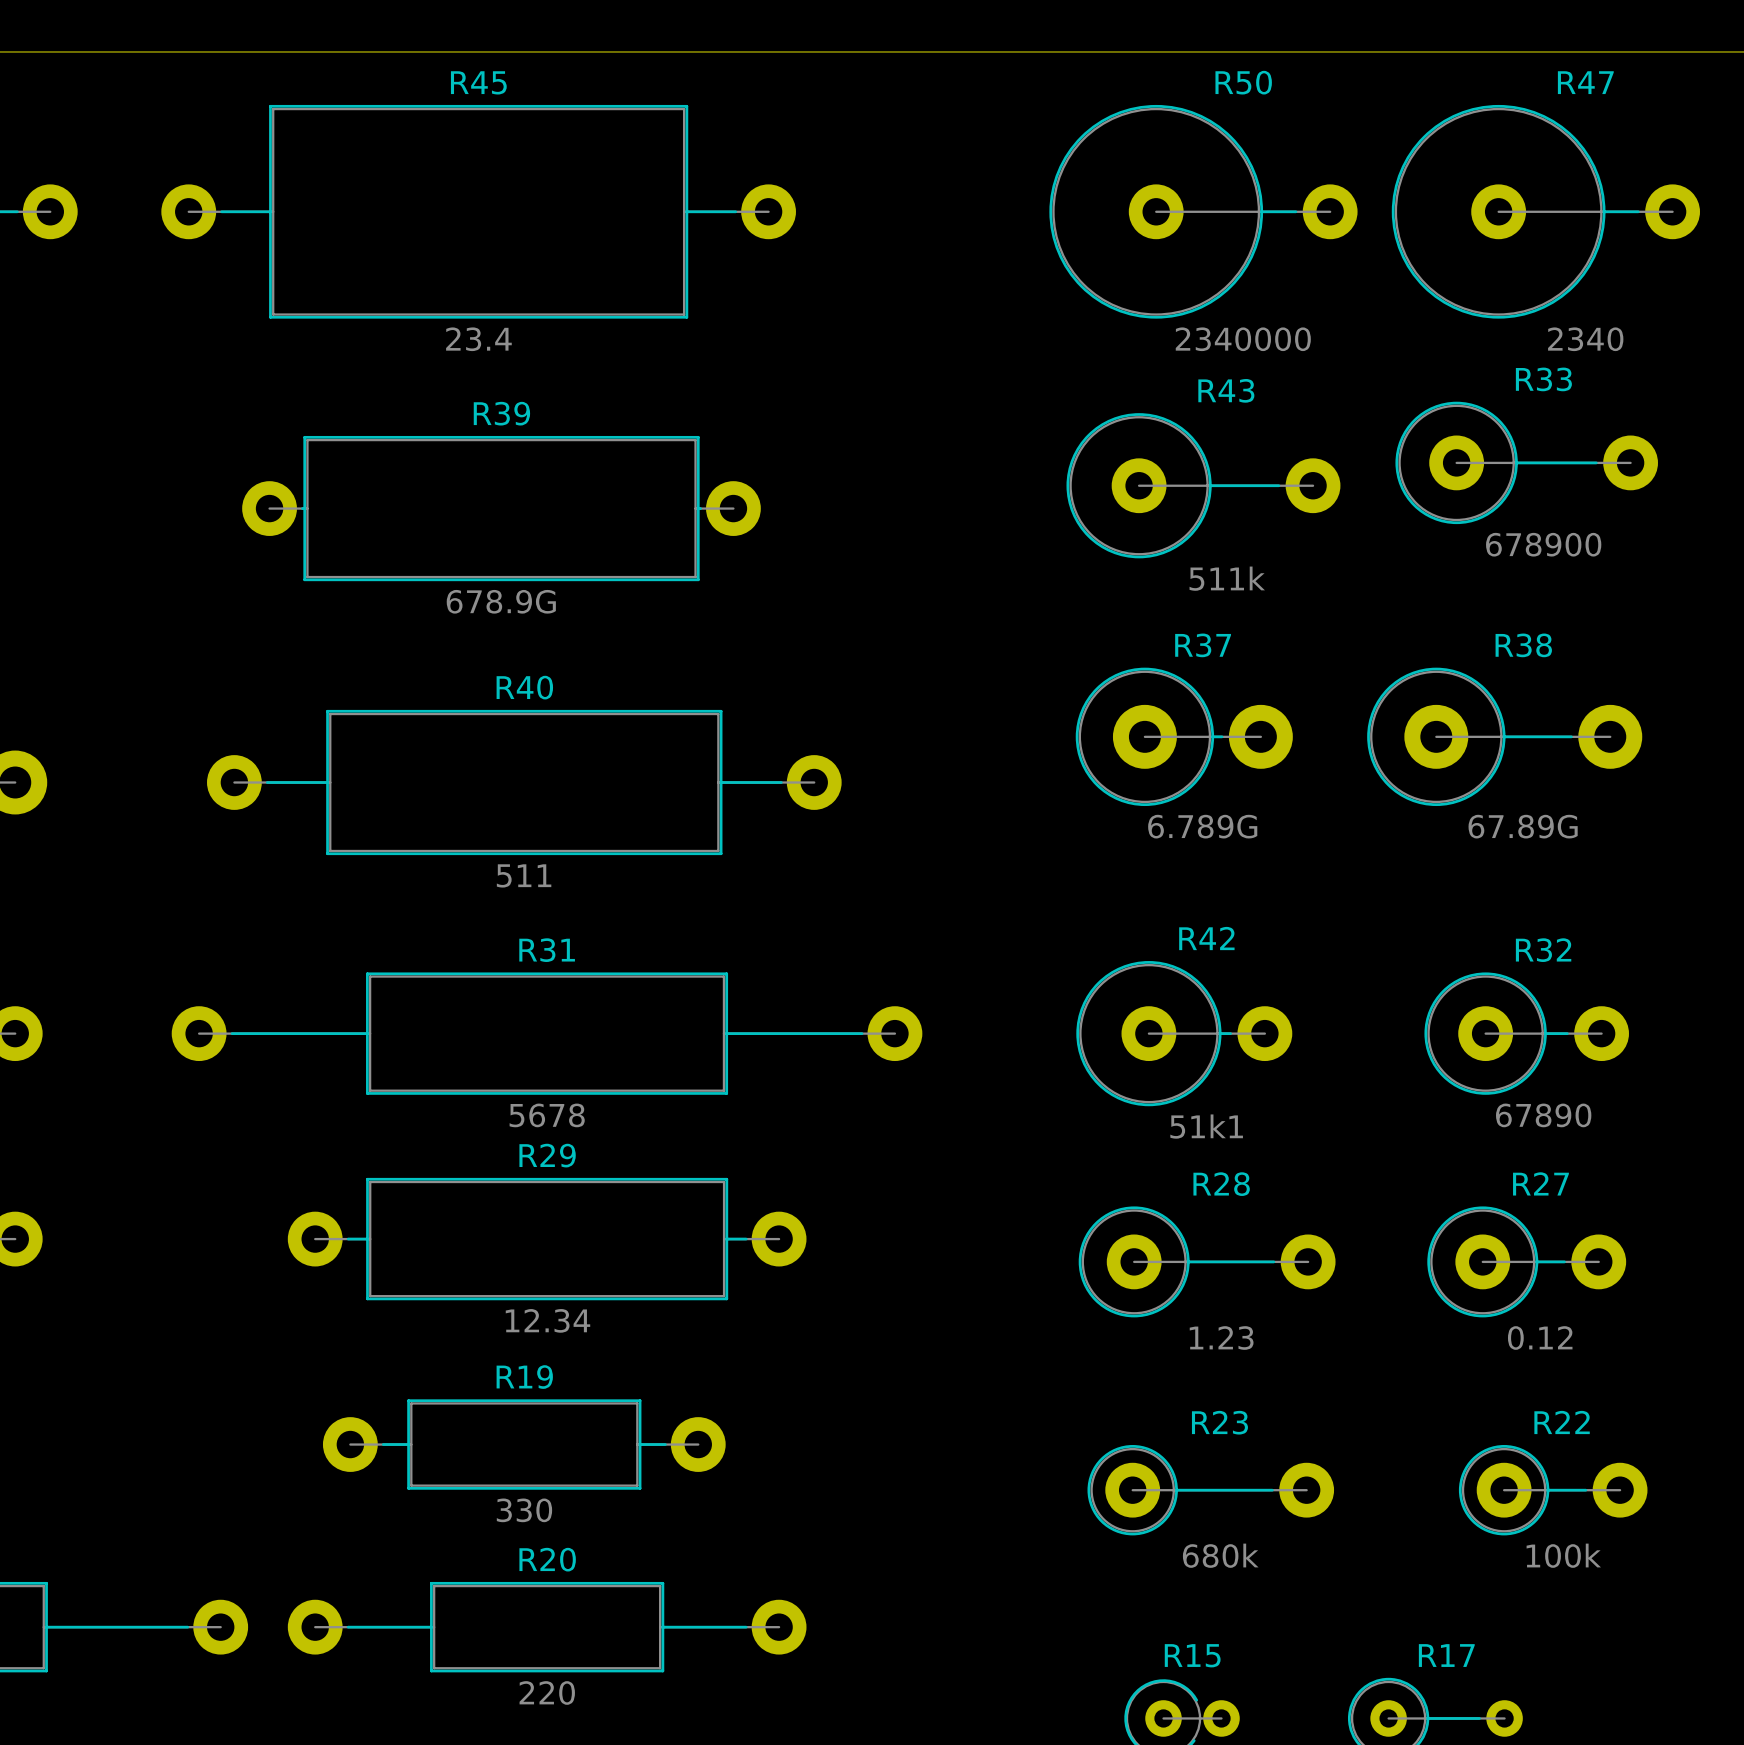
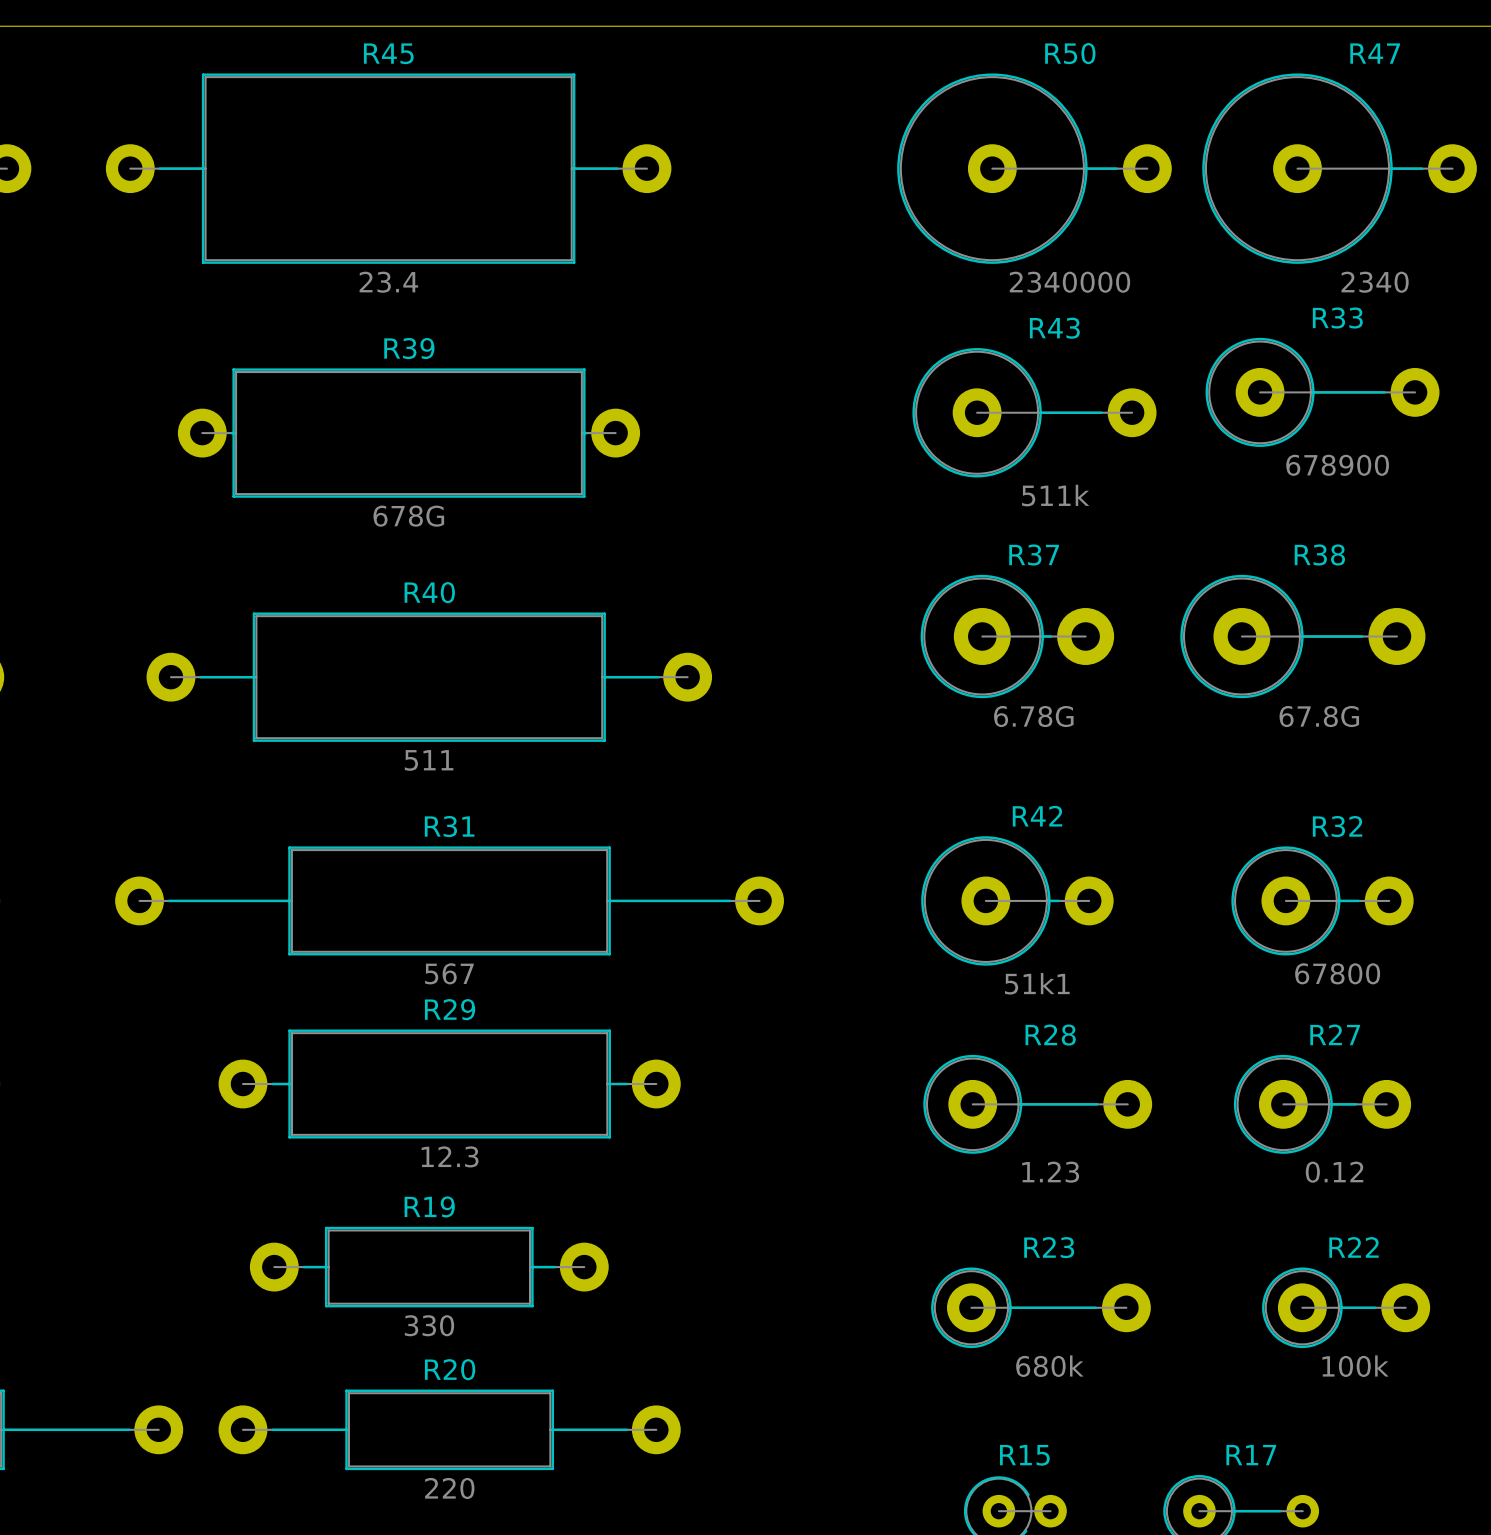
R39 value: 678.9G (501, 601) -> 678G (408, 516)
R37 value: 6.789G (1202, 826) -> 6.78G (1033, 716)
R38 value: 67.89G (1523, 826) -> 67.8G (1319, 716)
R31 value: 5678 (547, 1115) -> 567 (449, 973)
R32 value: 67890 (1543, 1115) -> 67800 (1337, 973)
R29 value: 12.34 (547, 1320) -> 12.3 (450, 1156)

